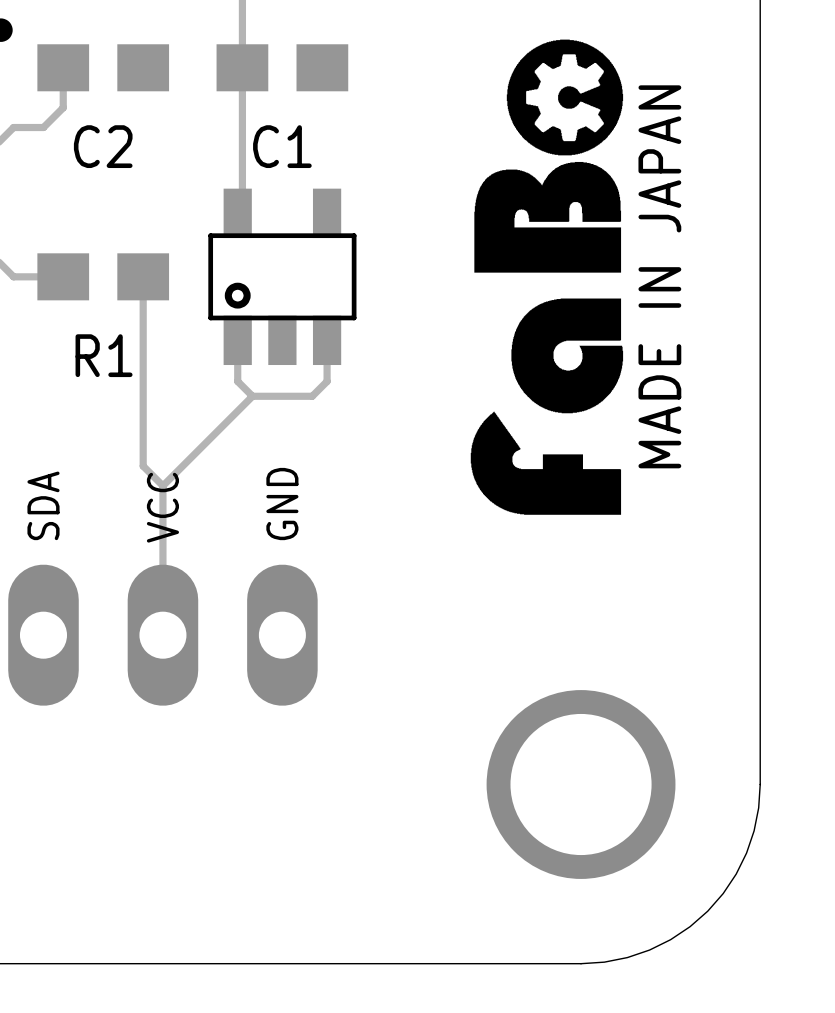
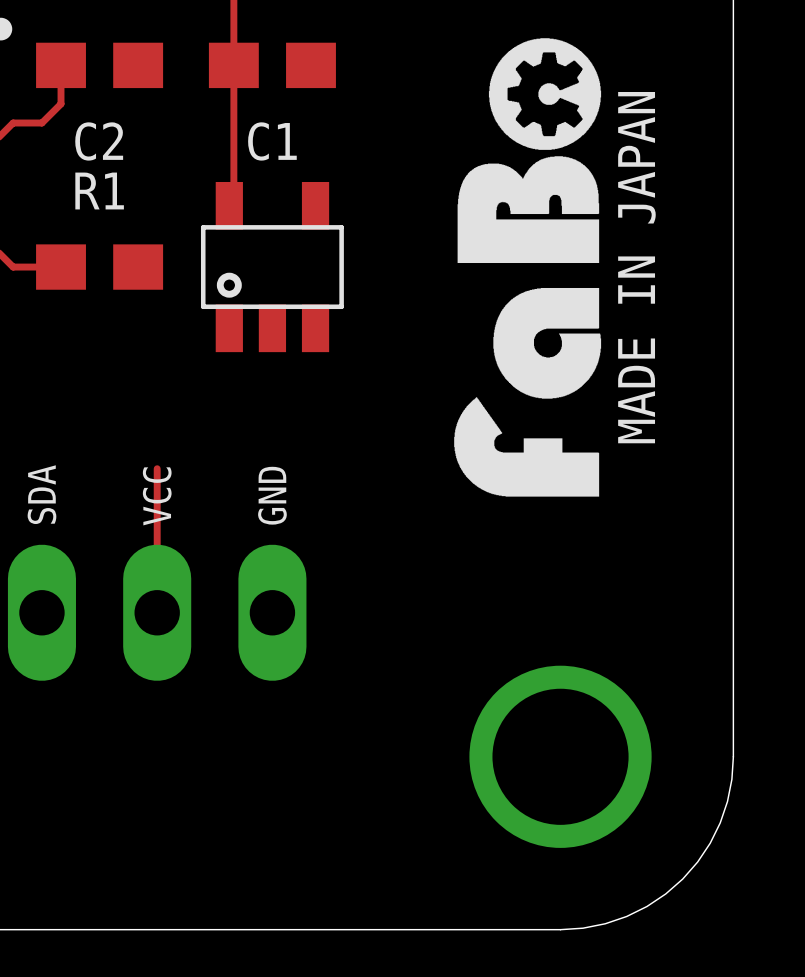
track: (143, 276) (143, 466) (162, 485) (252, 396) -> none
track: (237, 340) (237, 381) (252, 396) -> none
track: (327, 340) (327, 381) (312, 396) (252, 396) -> none
R1 name position: R1 (104, 355) -> R1 (99, 191)

